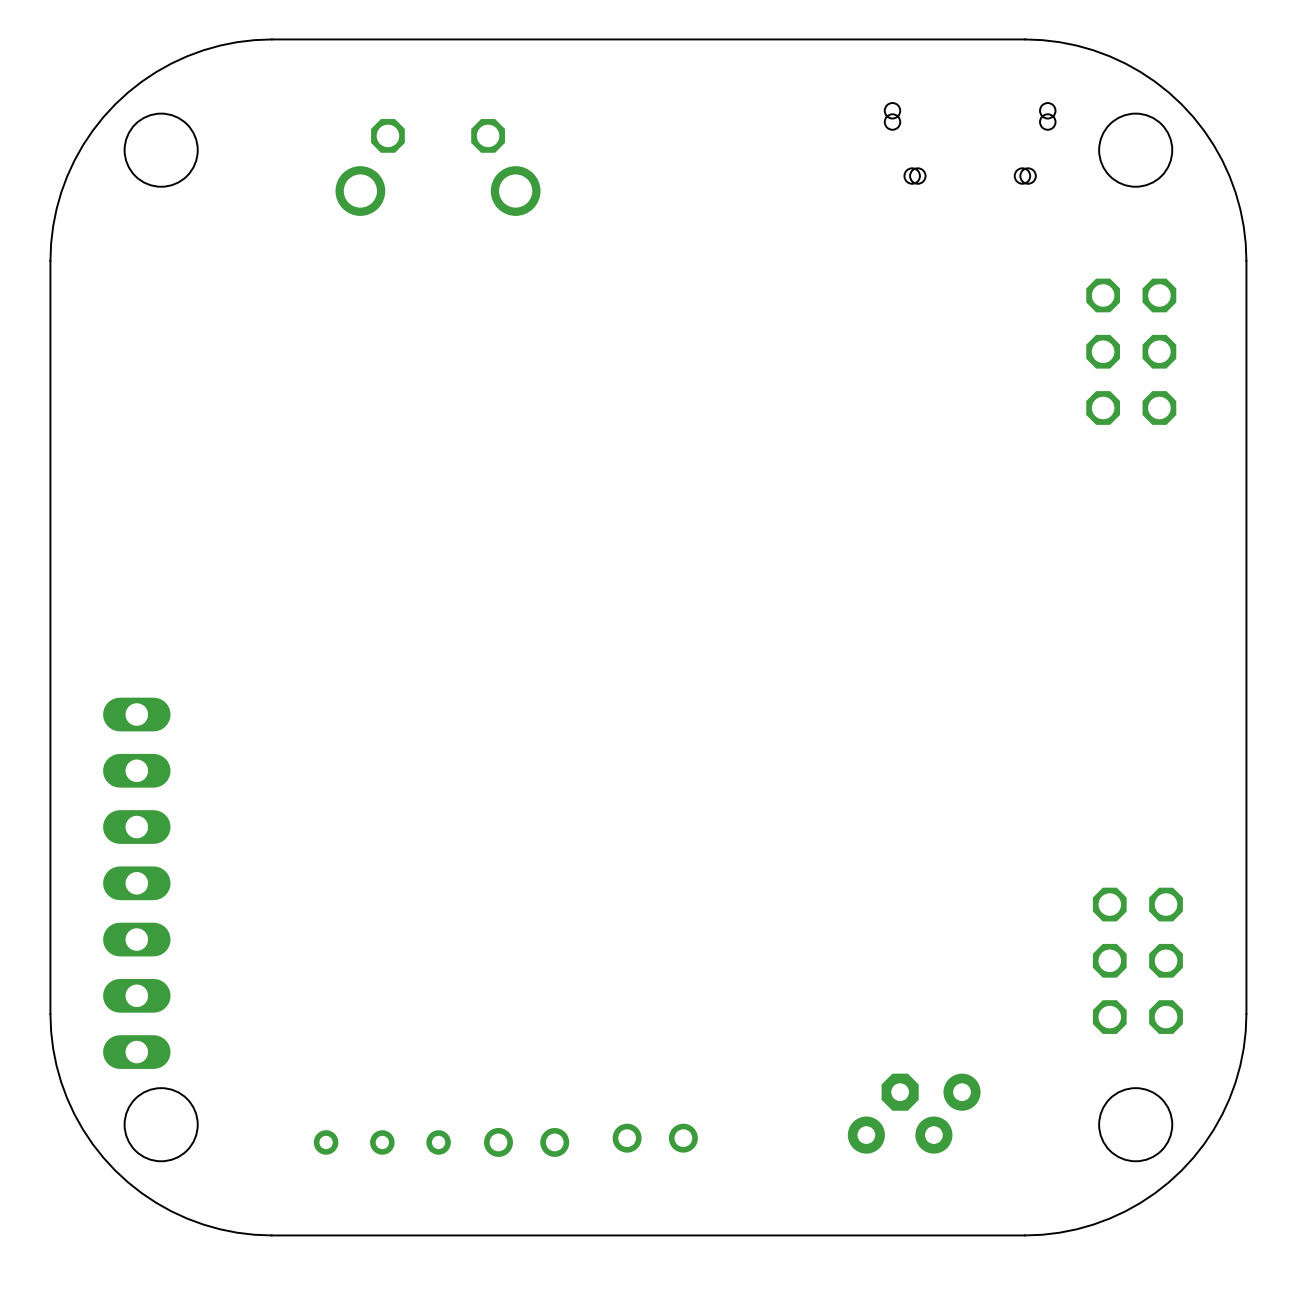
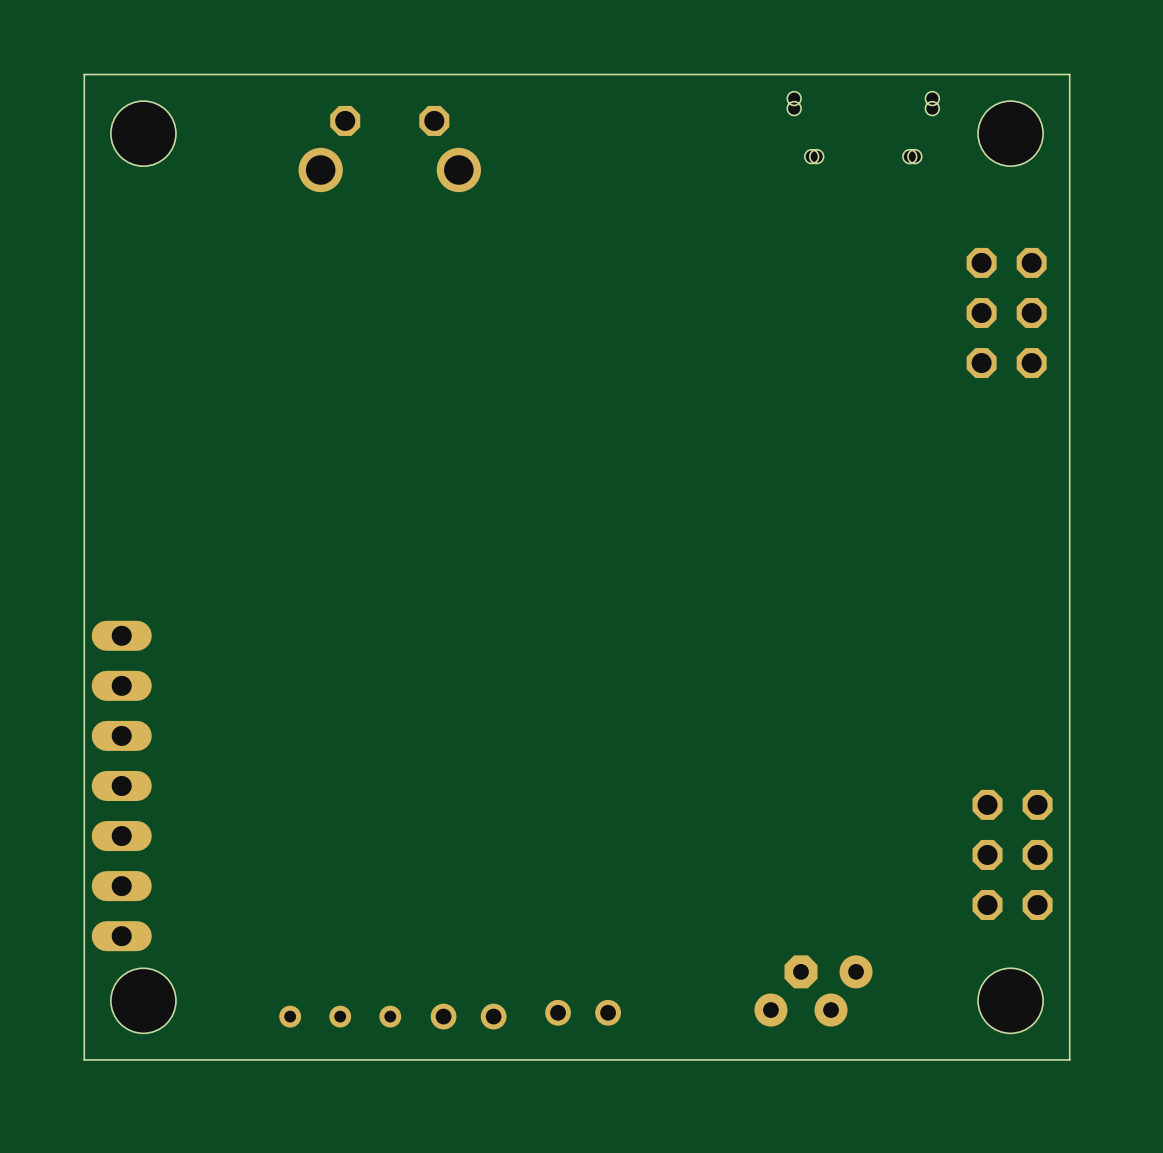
board edge: (1024, 39) (254, 40) (203, 50) (171, 63) (128, 92) (92, 130) (74, 160) (61, 192) (51, 243) (51, 1031) (61, 1082) (74, 1114) (103, 1157) (141, 1193) (171, 1211) (203, 1224) (254, 1234) (1042, 1234) (1093, 1224) (1125, 1211) (1168, 1182) (1204, 1144) (1222, 1114) (1235, 1082) (1245, 1031) (1246, 260) (1243, 226) (1235, 192) (1222, 160) (1204, 130) (1168, 92) (1125, 63) (1093, 50) (1059, 42) (1024, 39) -> (1069, 74) (1069, 1059) (84, 1059) (84, 74) (1069, 74)

